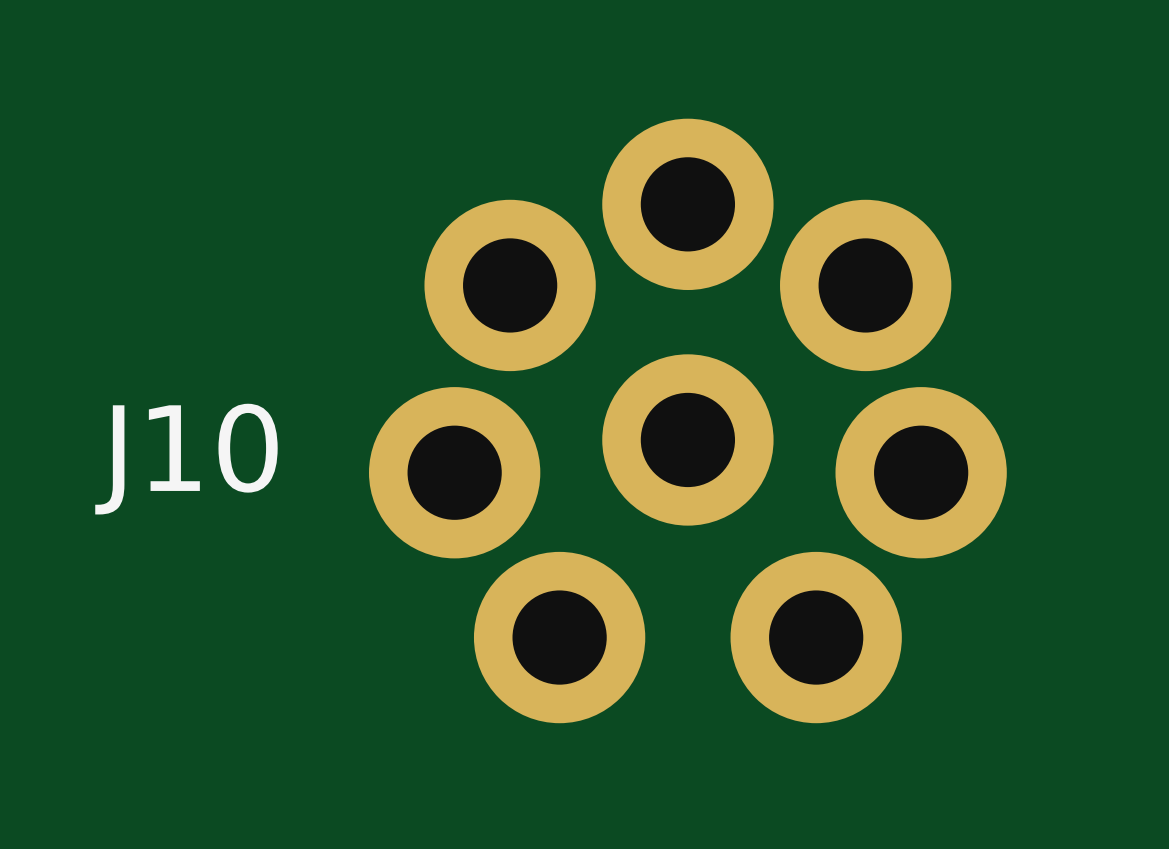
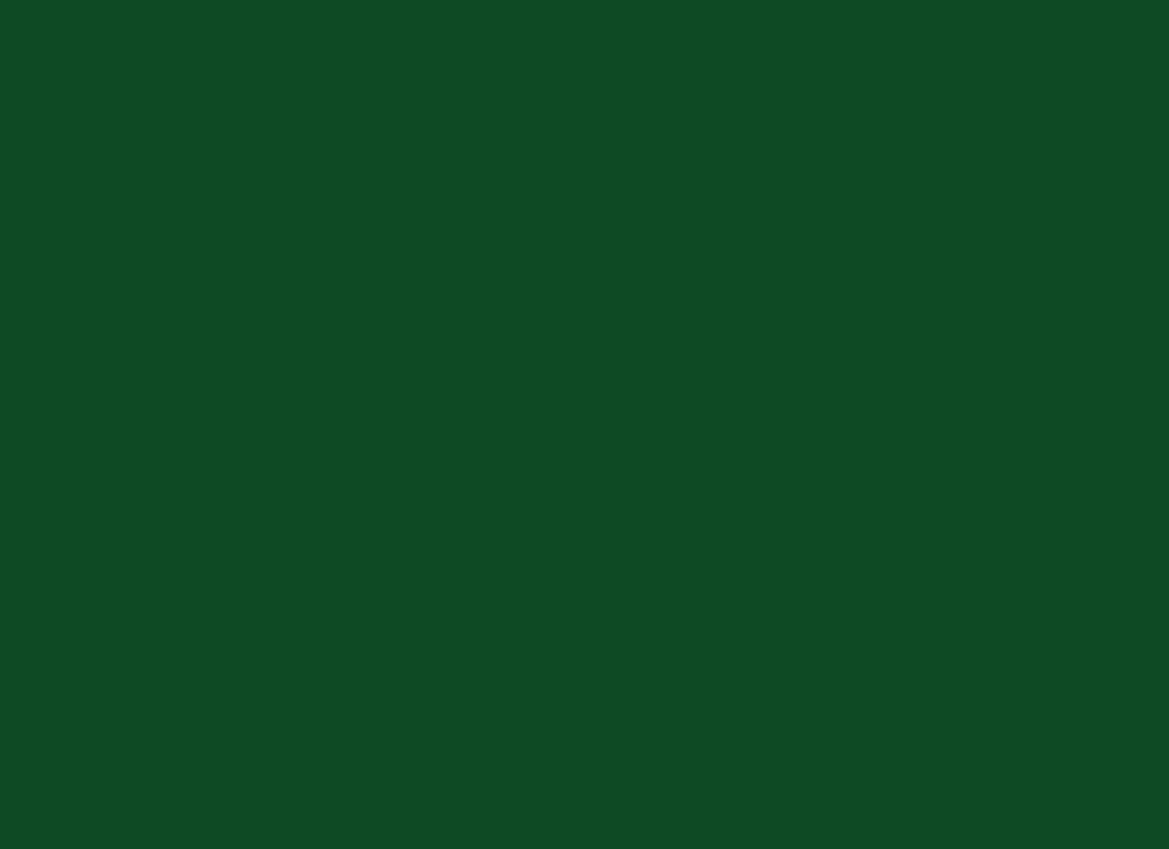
J10: (687, 420) -> none

